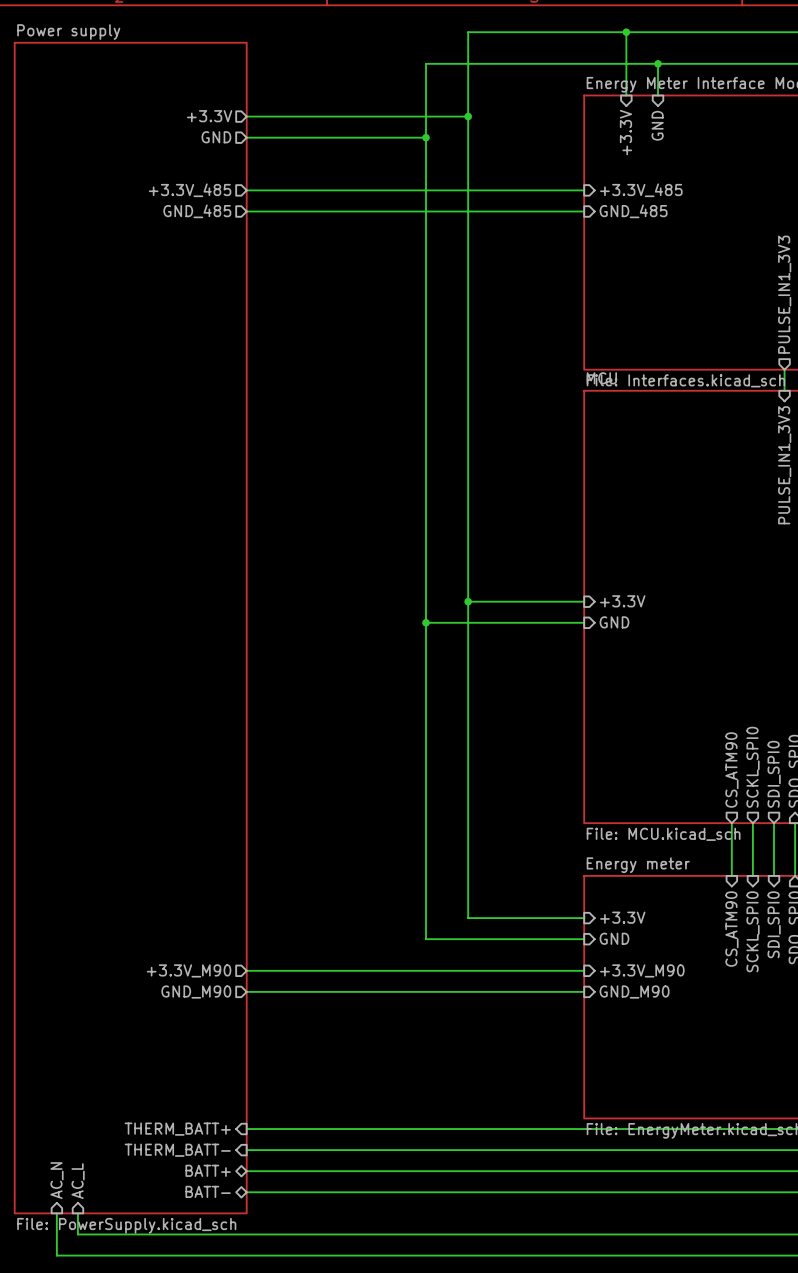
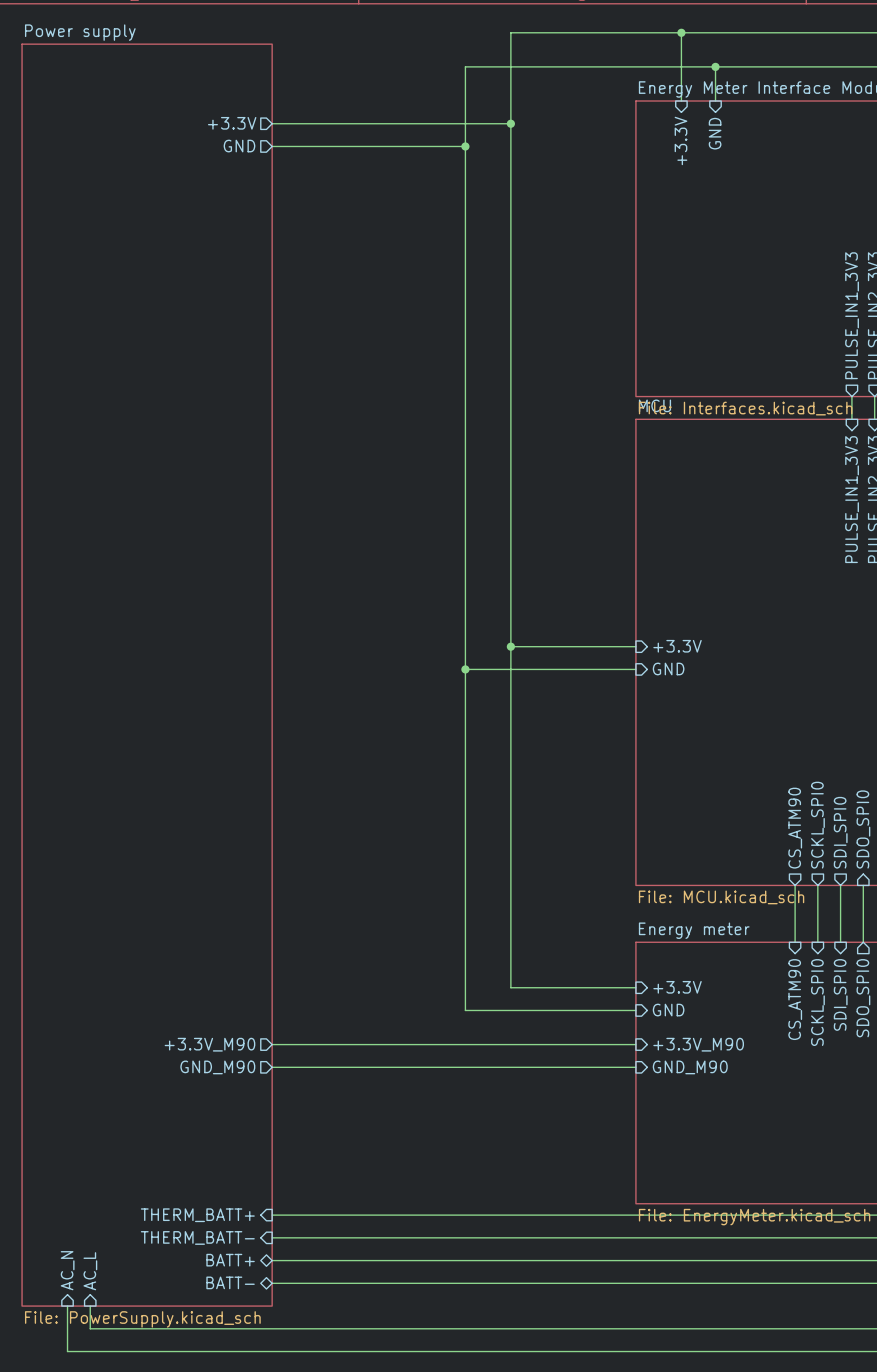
sheet pin: +3.3V_485 (190, 190) -> none
wire: (246, 190) (584, 190) -> none
sheet pin: +3.3V_485 (641, 190) -> none
sheet pin: GND_485 (197, 211) -> none
wire: (246, 211) (584, 211) -> none
sheet pin: GND_485 (633, 211) -> none

